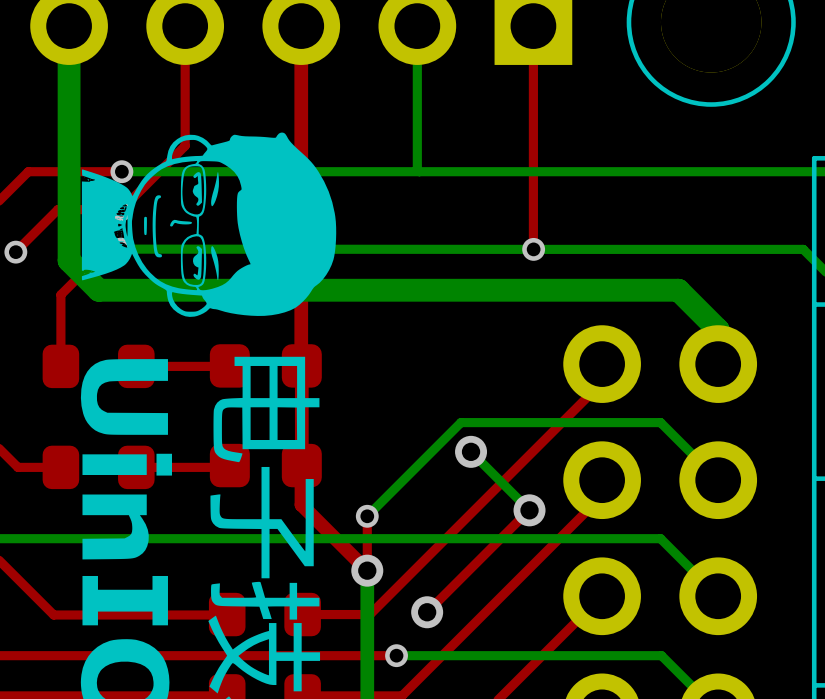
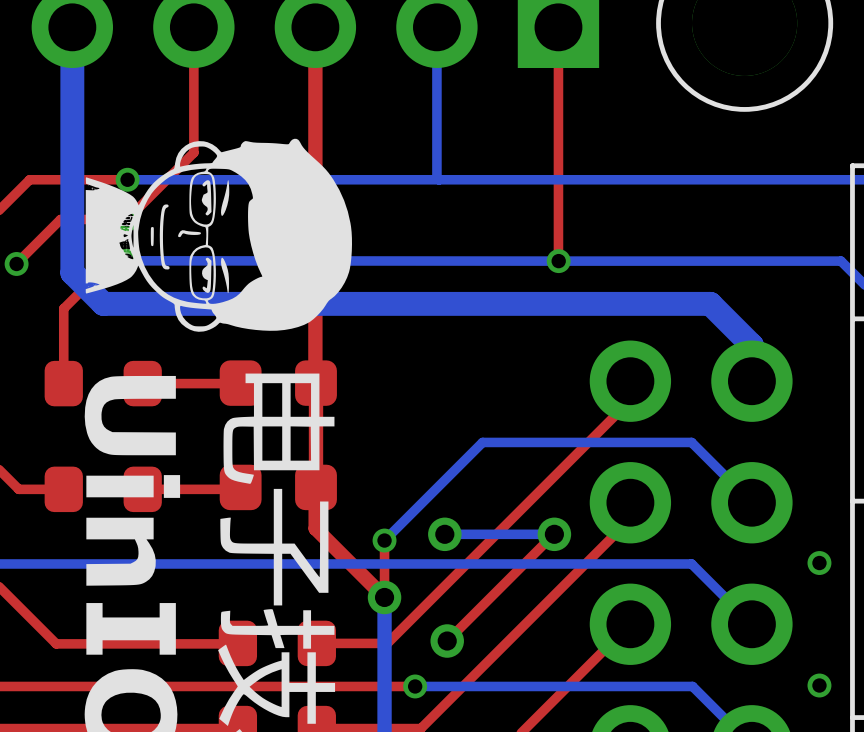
bottom track: (471, 451) (529, 510) -> (444, 534) (554, 534)
via position: (471, 451) -> (444, 534)
via: none -> (819, 563)
via: none -> (819, 685)

